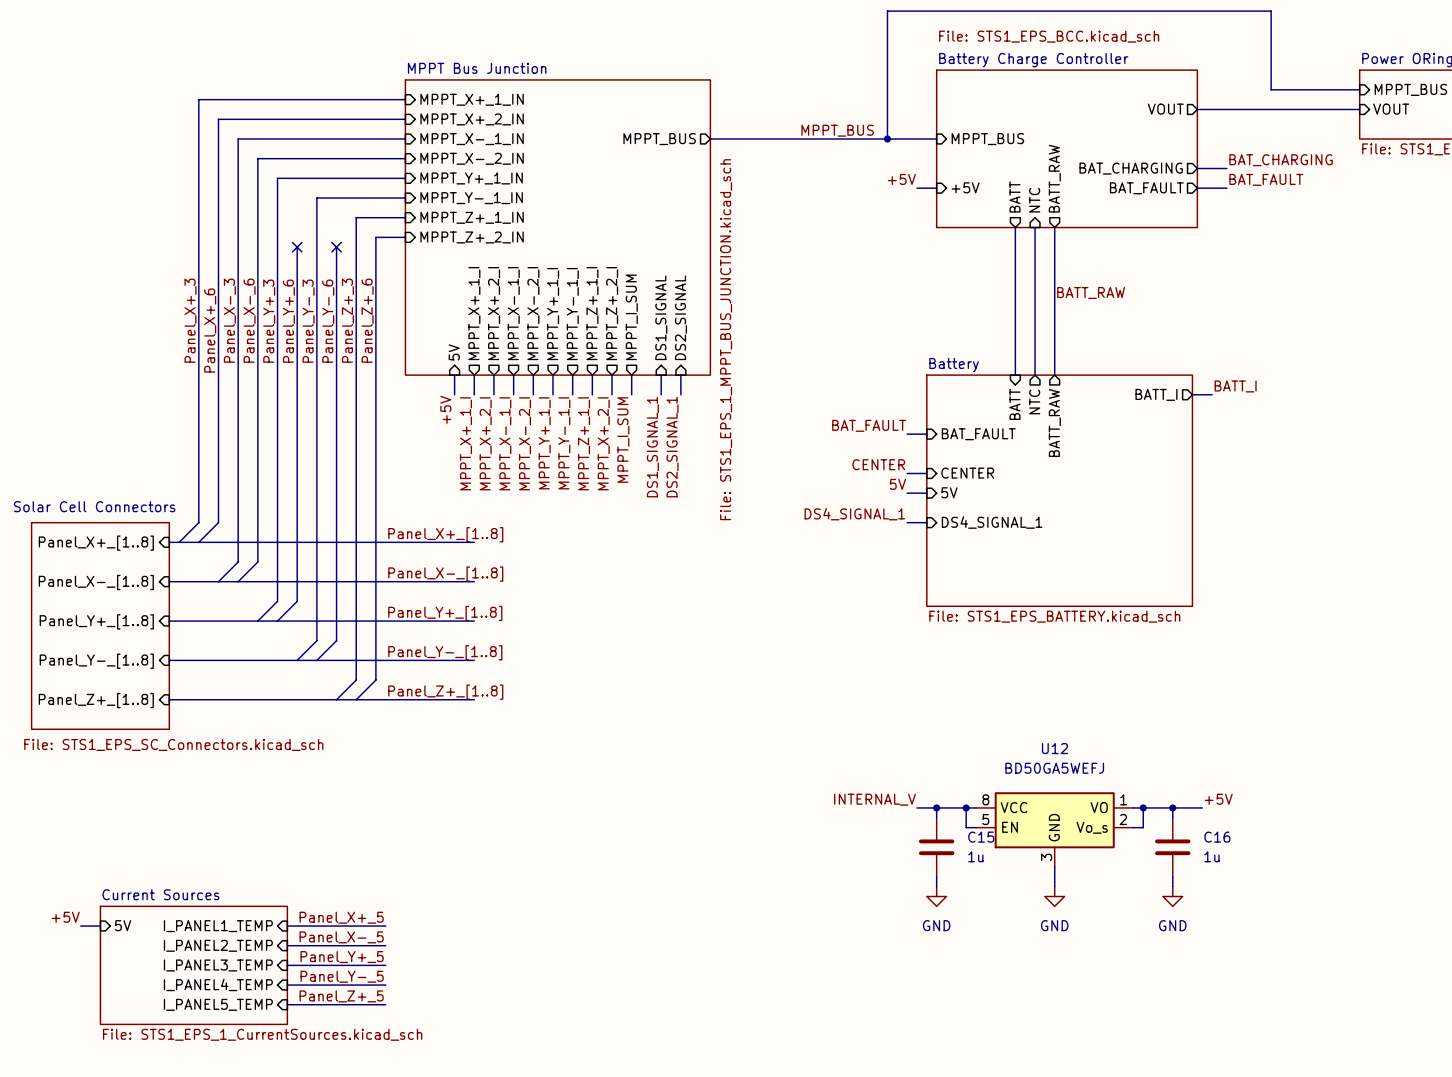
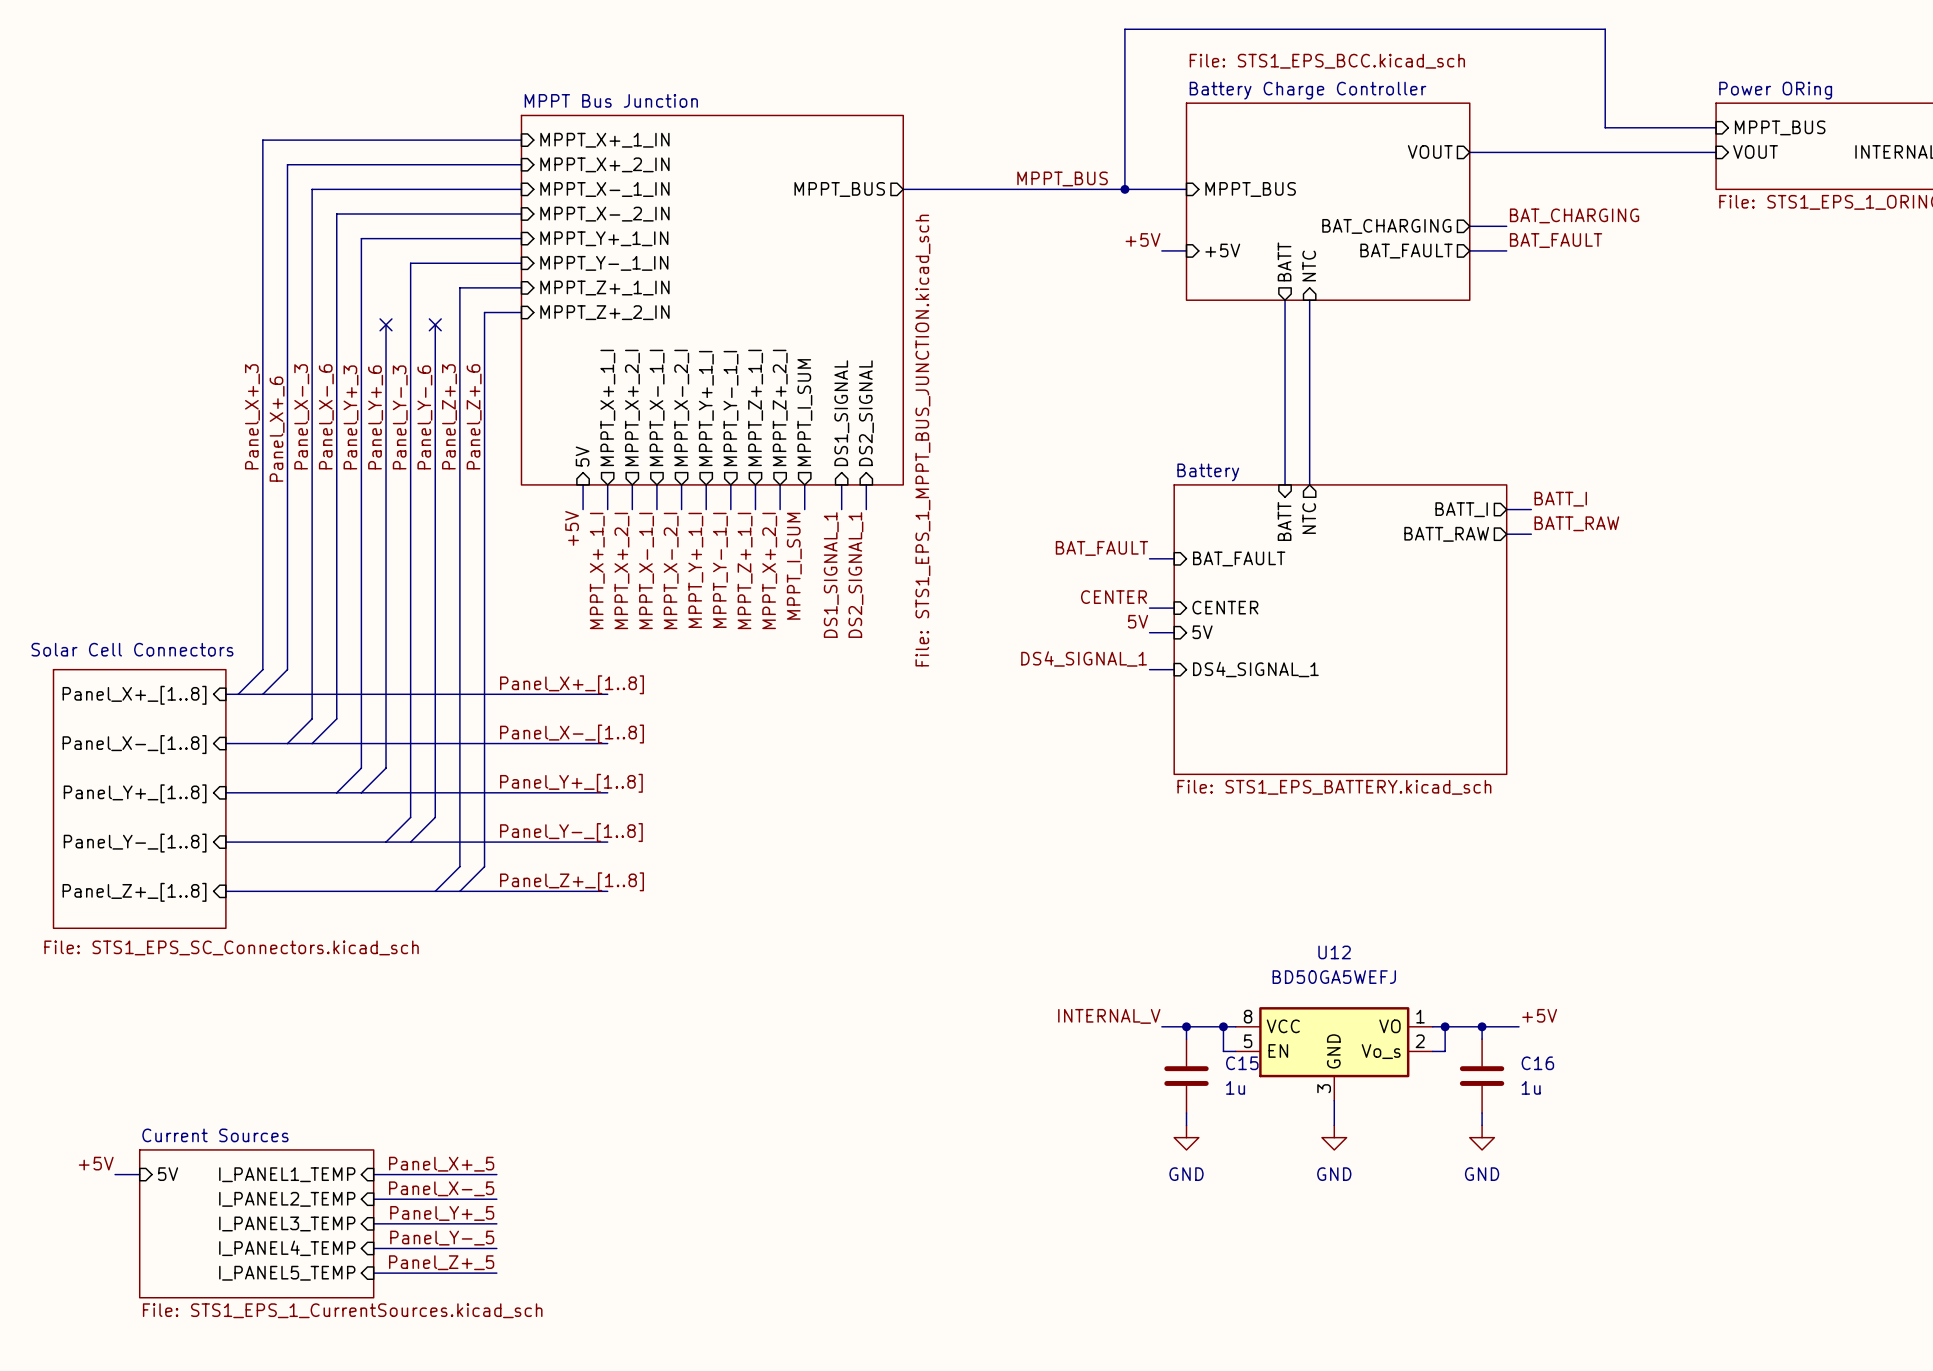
wire: none -> (1469, 152) (1512, 152)
sheet pin position: VOUT (1165, 109) -> VOUT (1430, 151)
sheet Battery Charge Controller: none -> File: STS1_EPS_BCC.kicad_sch (1328, 201)
sheet Battery Charge Controller: File: STS1_EPS_BCC.kicad_sch (1067, 148) -> none
label position: BAT_CHARGING (1281, 160) -> BAT_CHARGING (1574, 215)
sheet pin position: BAT_CHARGING (1131, 168) -> BAT_CHARGING (1386, 226)
wire: (1197, 168) (1226, 168) -> (1469, 226) (1506, 226)
sheet pin: BATT_RAW (1054, 178) -> none
label position: BAT_FAULT (1266, 179) -> BAT_FAULT (1556, 240)
sheet pin position: BAT_FAULT (1146, 188) -> BAT_FAULT (1406, 251)
wire: (1197, 188) (1226, 188) -> (1469, 250) (1506, 250)
wire: (1054, 227) (1054, 375) -> none
label: BATT_RAW (1091, 293) -> none
label: none -> BATT_RAW (1576, 523)
sheet pin: none -> BATT_RAW (1446, 534)
wire: none -> (1506, 534) (1531, 534)
sheet pin: BATT_RAW (1054, 423) -> none

